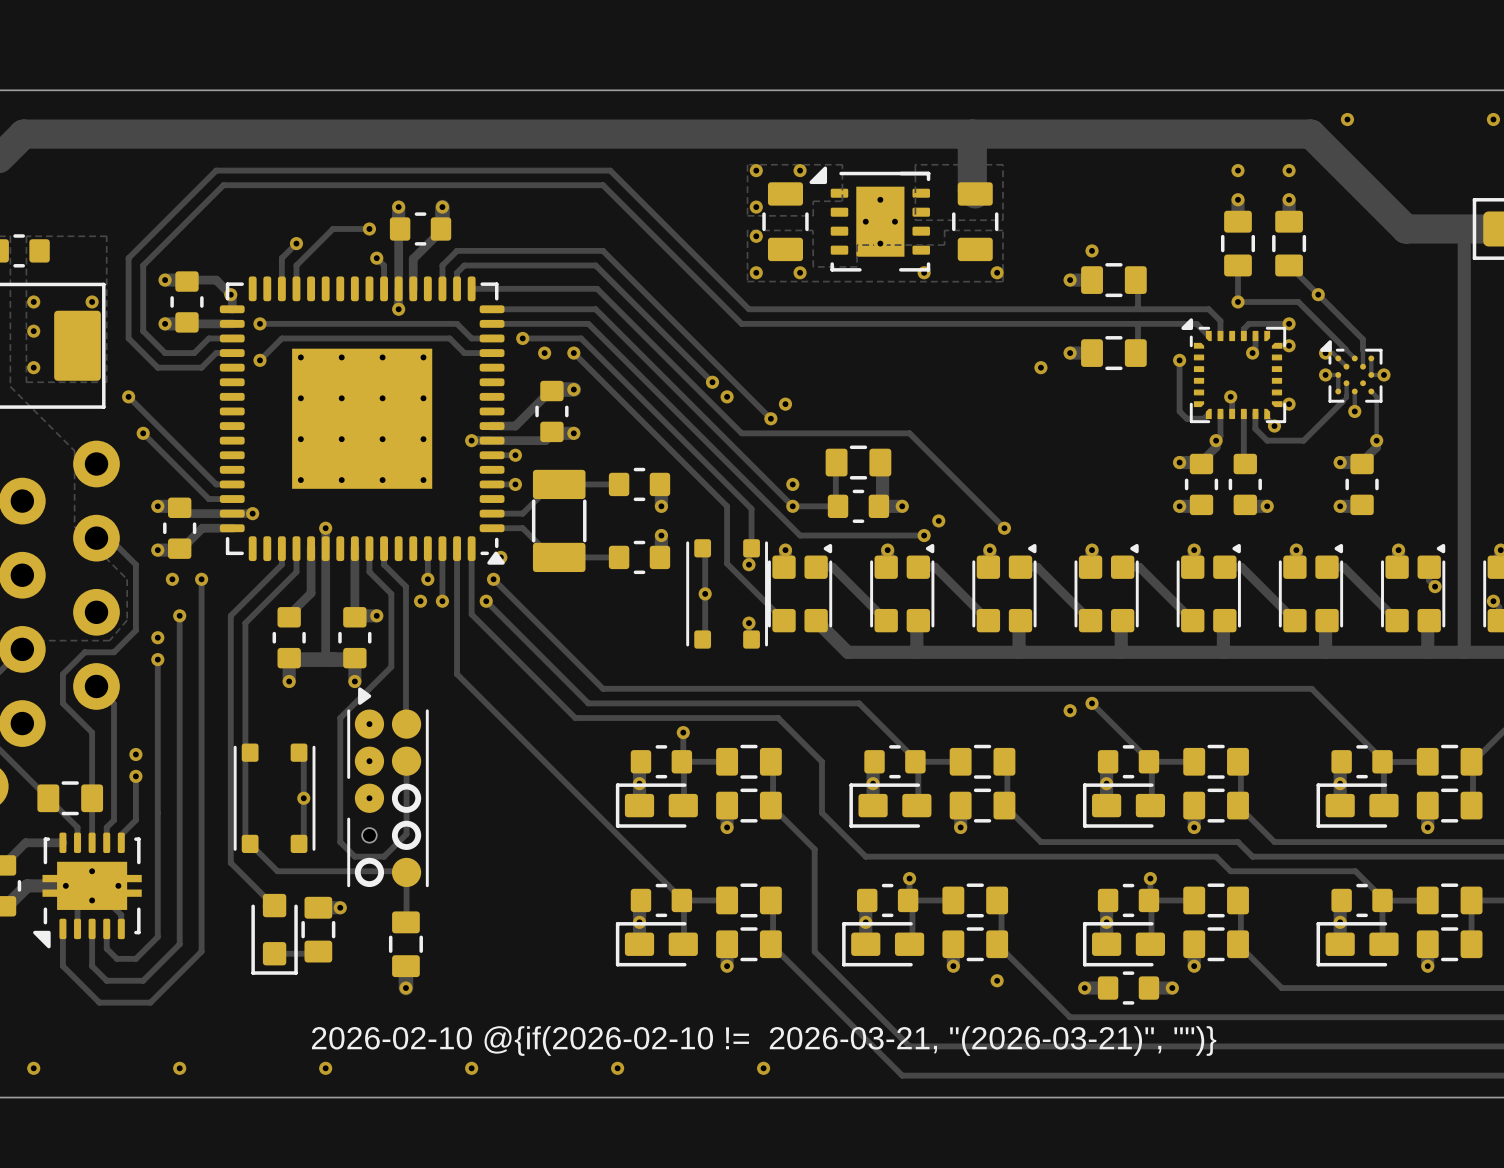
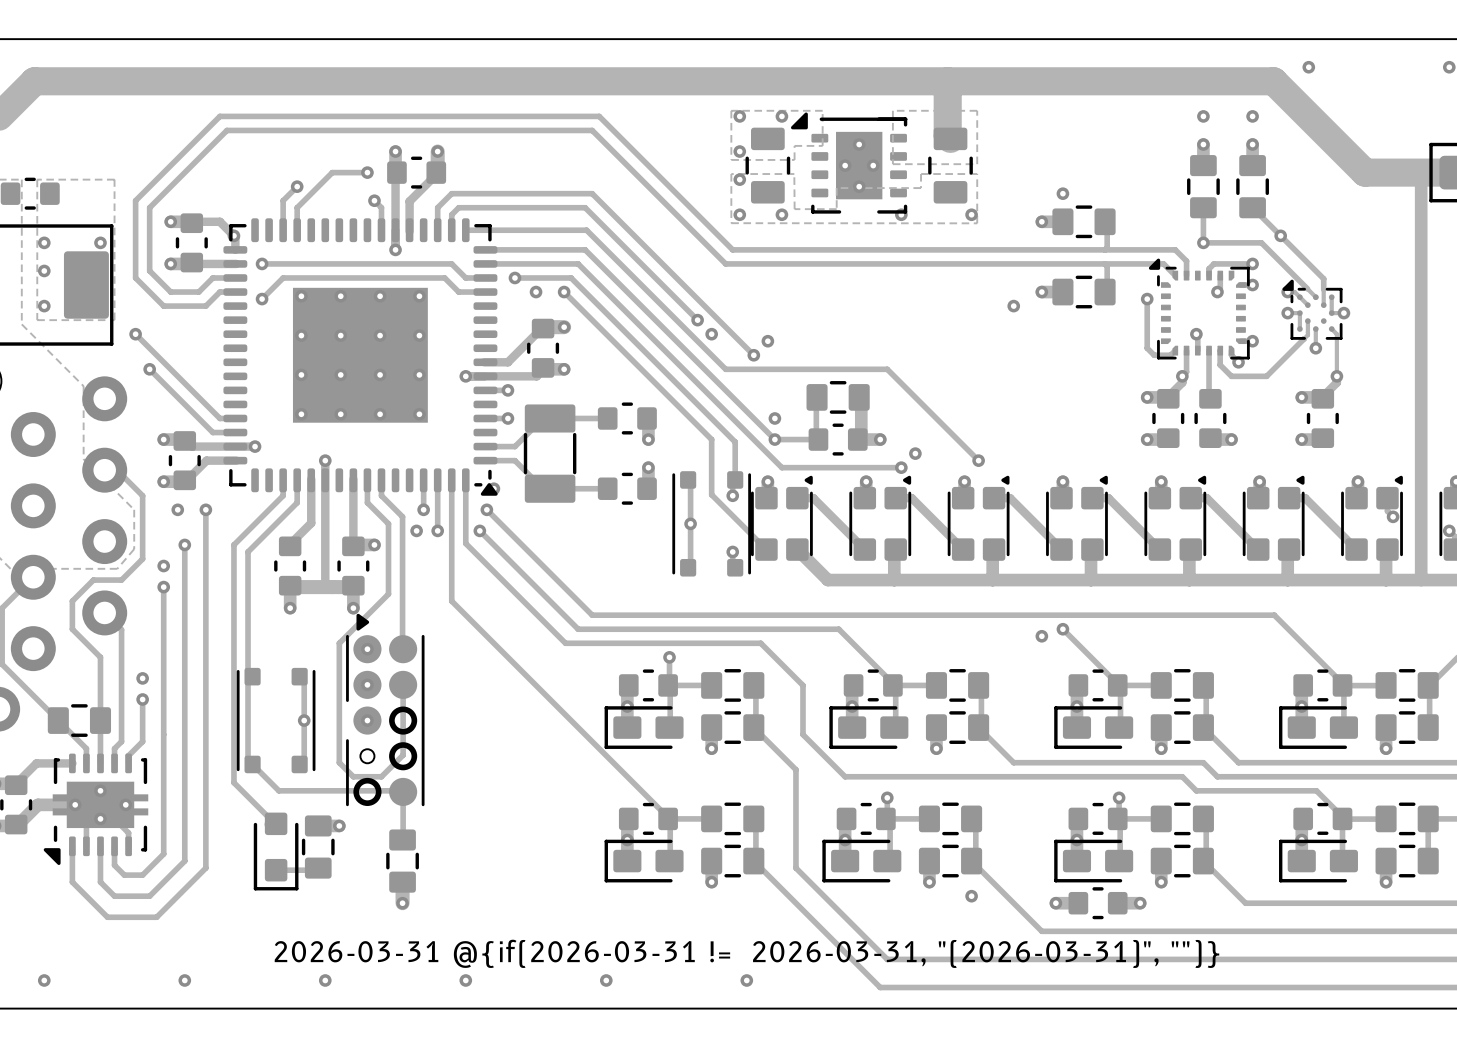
drawing shape: [311, 1026, 1217, 1056] -> [274, 939, 1220, 968]

